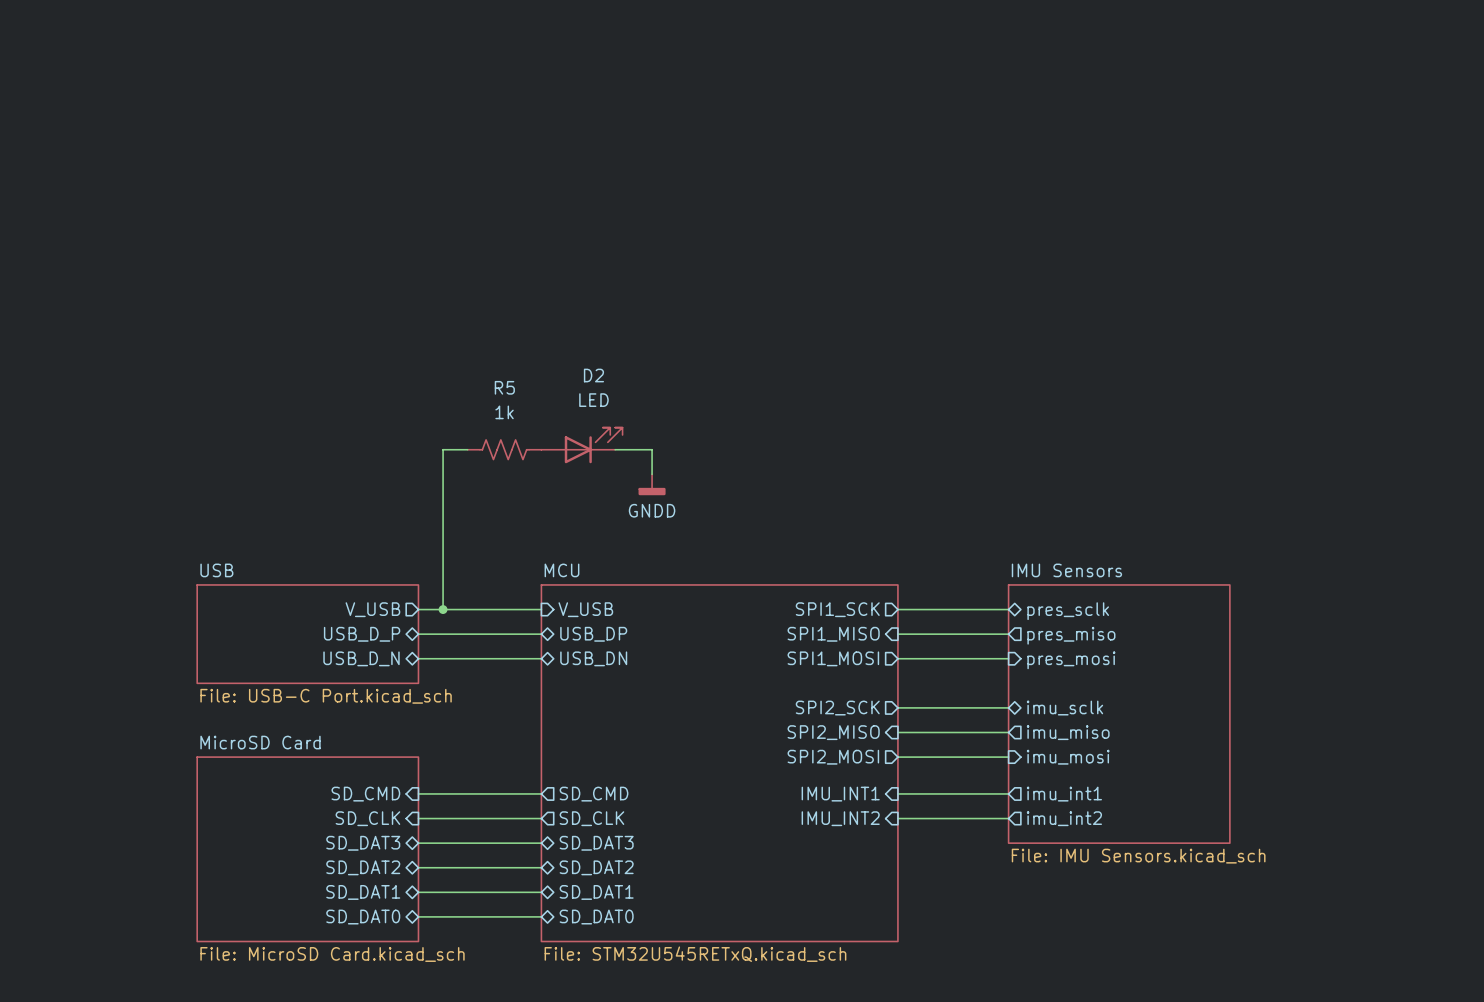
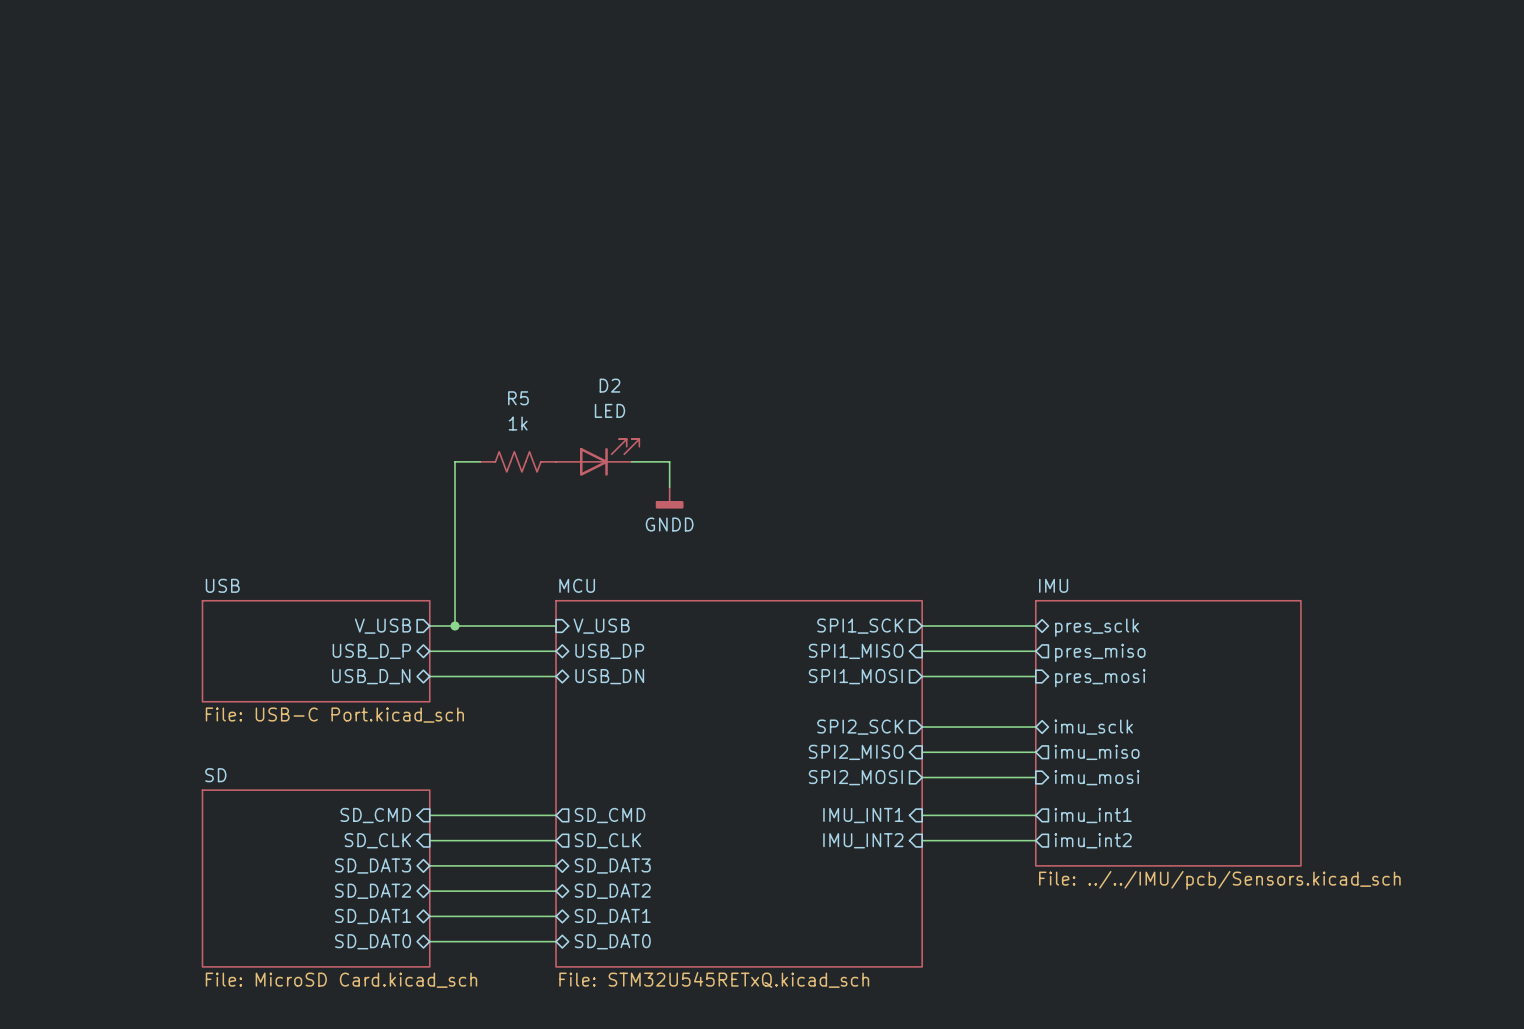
sheet IMU Sensors: File: IMU Sensors.kicad_sch (1119, 714) -> none
sheet IMU: none -> File: ../../IMU/pcb/Sensors.kicad_sch (1168, 733)
sheet MicroSD Card: File: MicroSD Card.kicad_sch (307, 849) -> none
sheet SD: none -> File: MicroSD Card.kicad_sch (316, 878)

